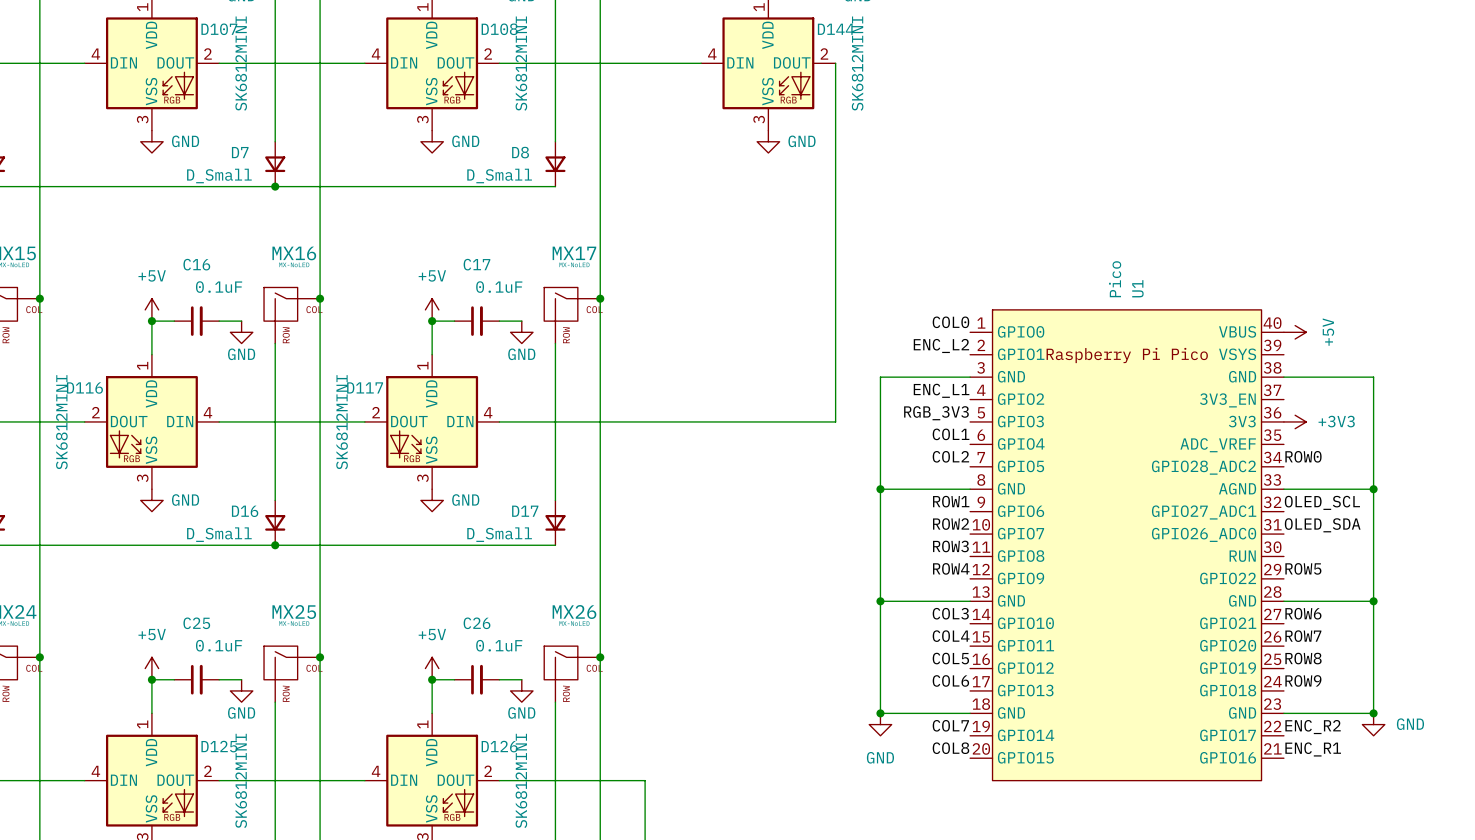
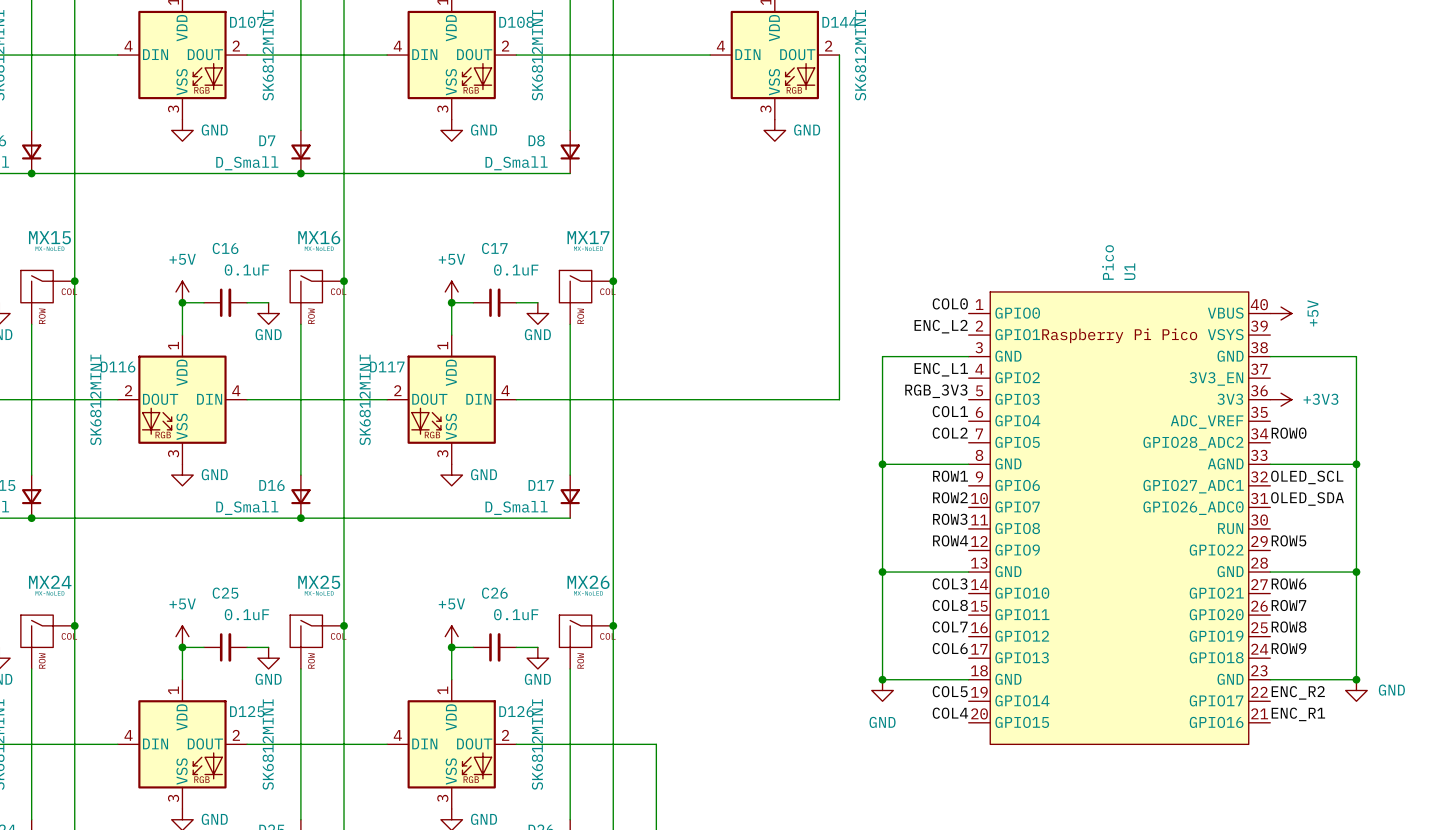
label: COL4 (951, 636) -> COL8 (950, 605)
label: COL5 (950, 658) -> COL7 (950, 627)
label: COL7 (950, 725) -> COL5 (950, 691)
label: COL8 (950, 748) -> COL4 (950, 713)

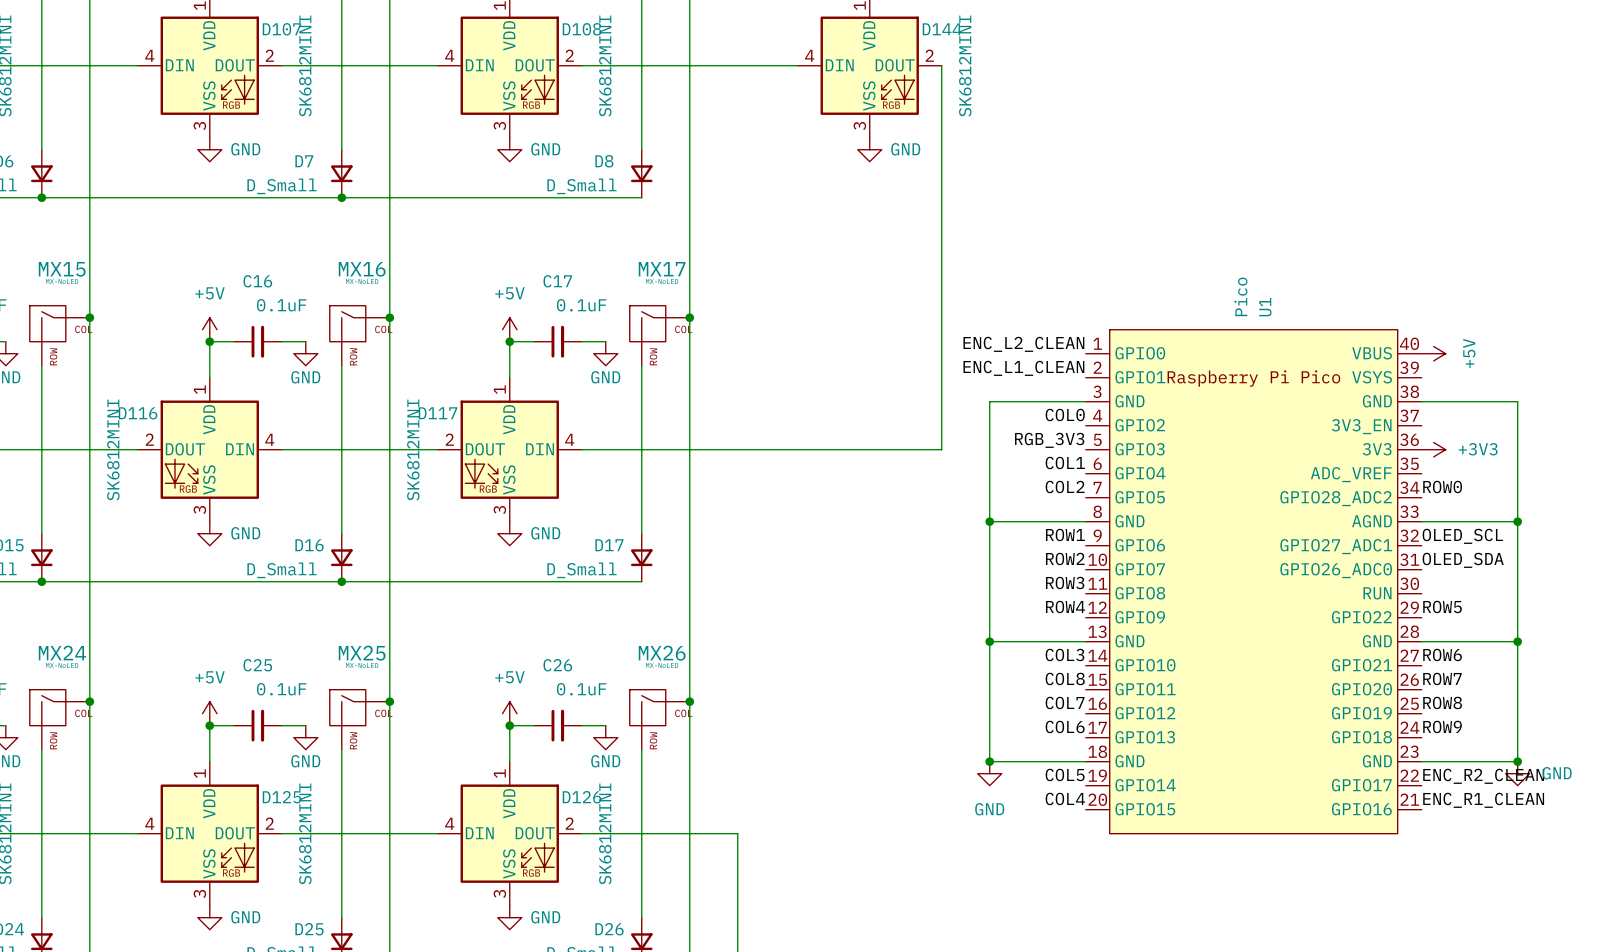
label: COL0 (950, 303) -> ENC_L2_CLEAN (1023, 344)
label: ENC_L2 (941, 326) -> ENC_L1_CLEAN (1023, 368)
label: ENC_L1 (941, 369) -> COL0 (1065, 415)
label: ENC_R2 (1298, 692) -> ENC_R2_CLEAN (1483, 776)
label: ENC_R1 (1298, 714) -> ENC_R1_CLEAN (1483, 800)

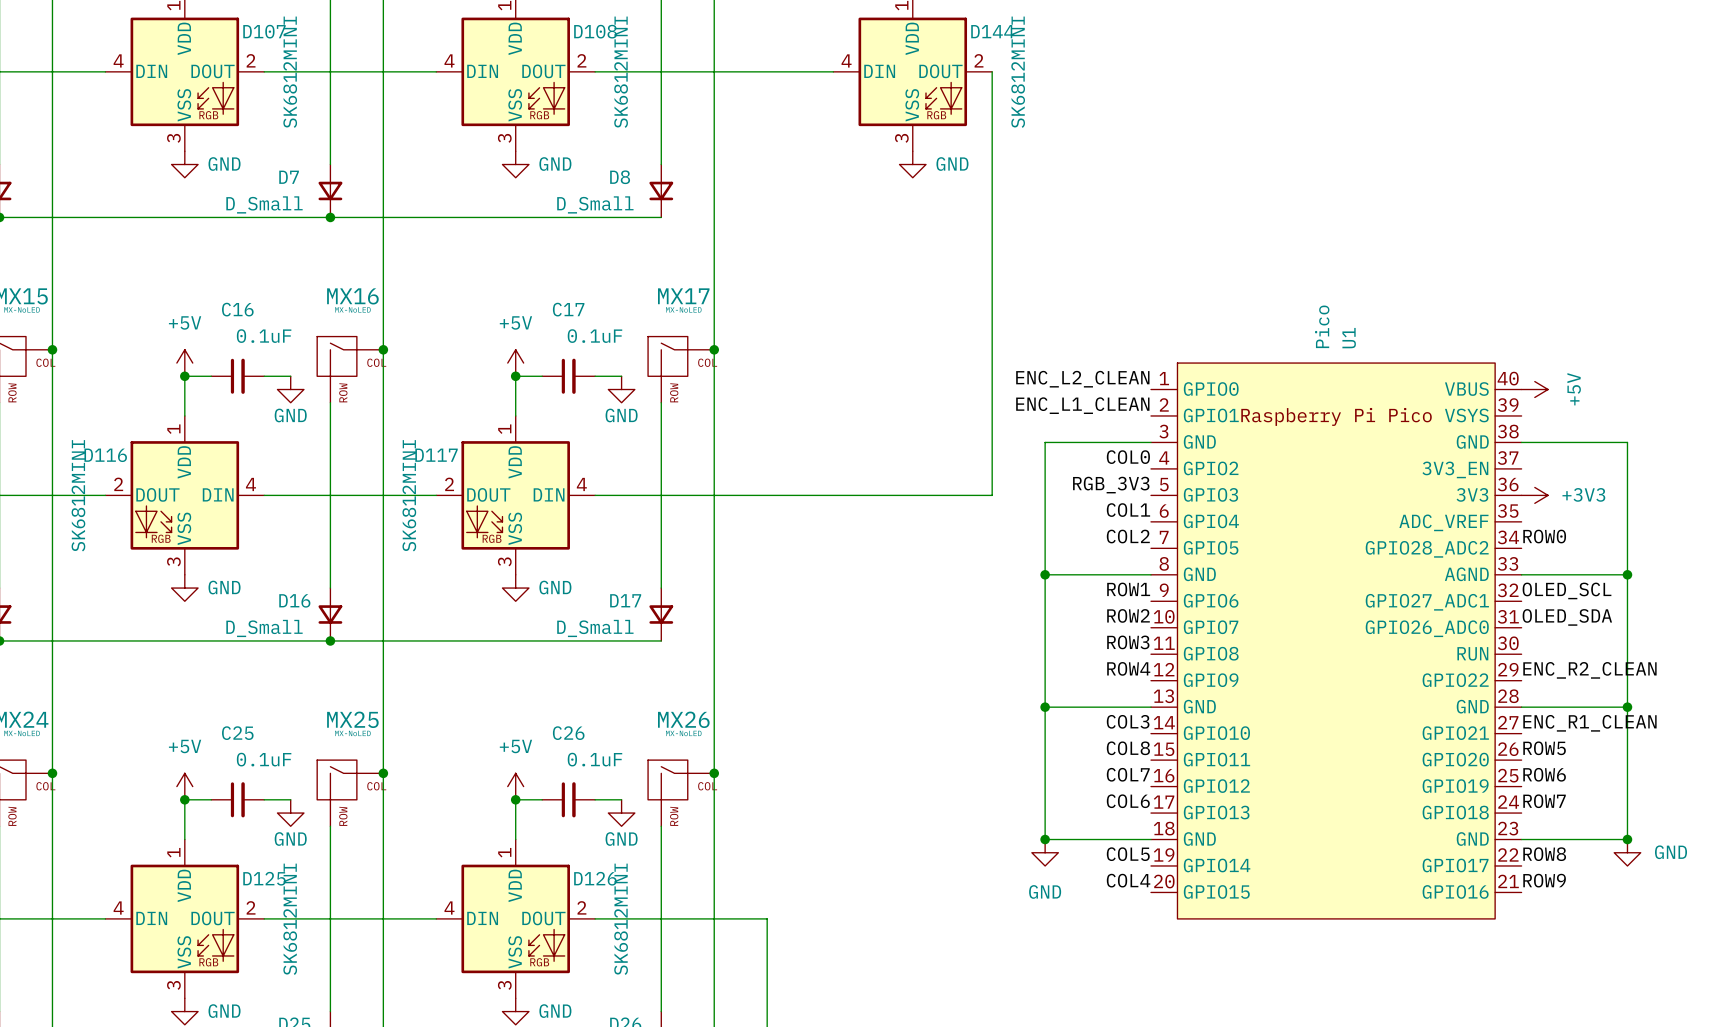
label: ROW5 (1442, 606) -> ENC_R2_CLEAN (1589, 670)
label: ROW6 (1442, 654) -> ENC_R1_CLEAN (1589, 723)
label: ROW7 (1442, 678) -> ROW5 (1544, 748)
label: ROW8 (1442, 702) -> ROW6 (1544, 774)
label: ROW9 (1442, 726) -> ROW7 (1544, 801)
label: ENC_R2_CLEAN (1483, 776) -> ROW8 (1544, 854)
label: ENC_R1_CLEAN (1483, 800) -> ROW9 (1544, 880)

